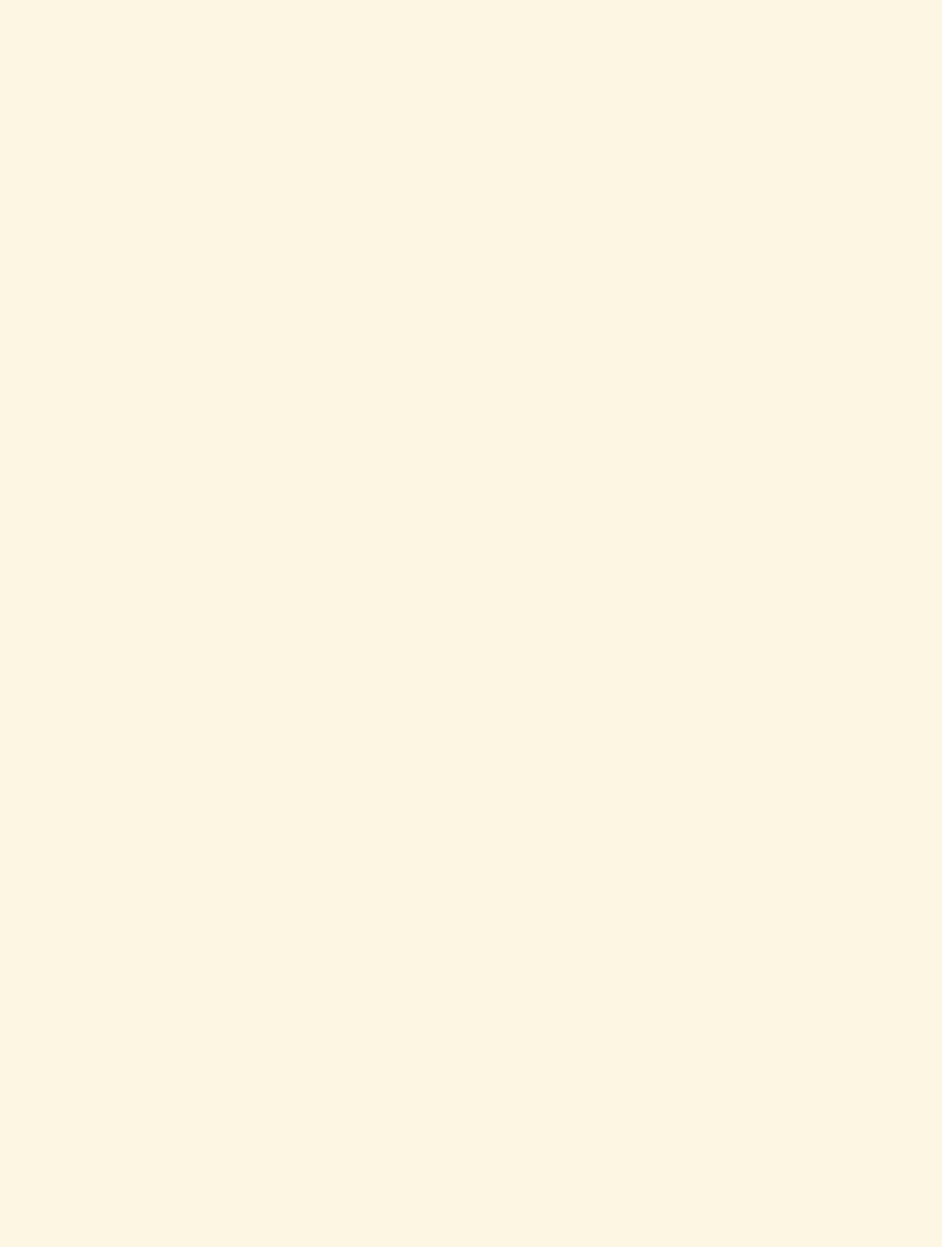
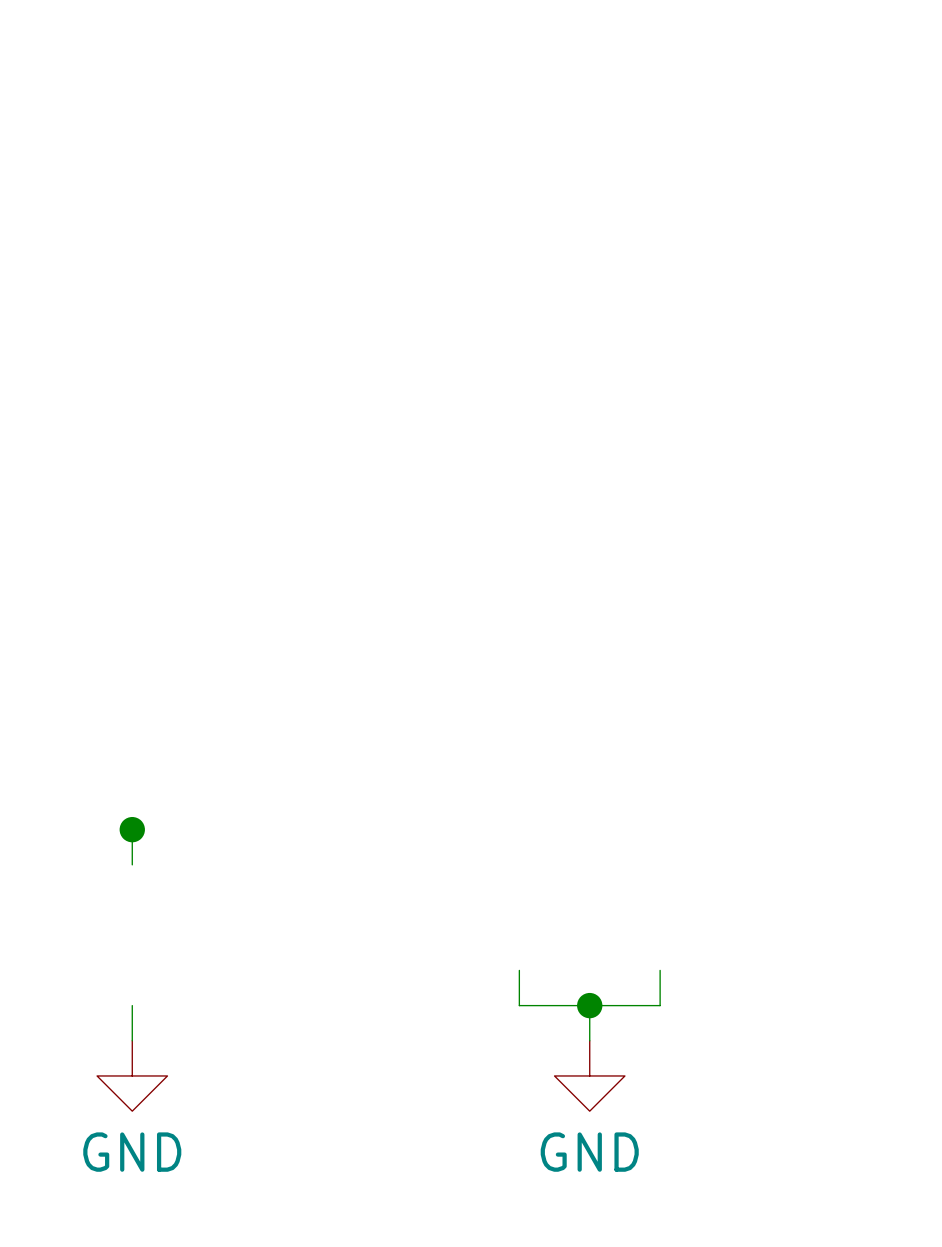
wire: none -> (132, 829) (132, 864)
junction: none -> (132, 829)
wire: none -> (519, 970) (519, 1005) (660, 1005) (660, 970)
wire: none -> (132, 1005) (132, 1040)
wire: none -> (589, 1005) (589, 1040)
junction: none -> (589, 1005)
power symbol: none -> GND (132, 1075)
power symbol: none -> GND (589, 1075)

